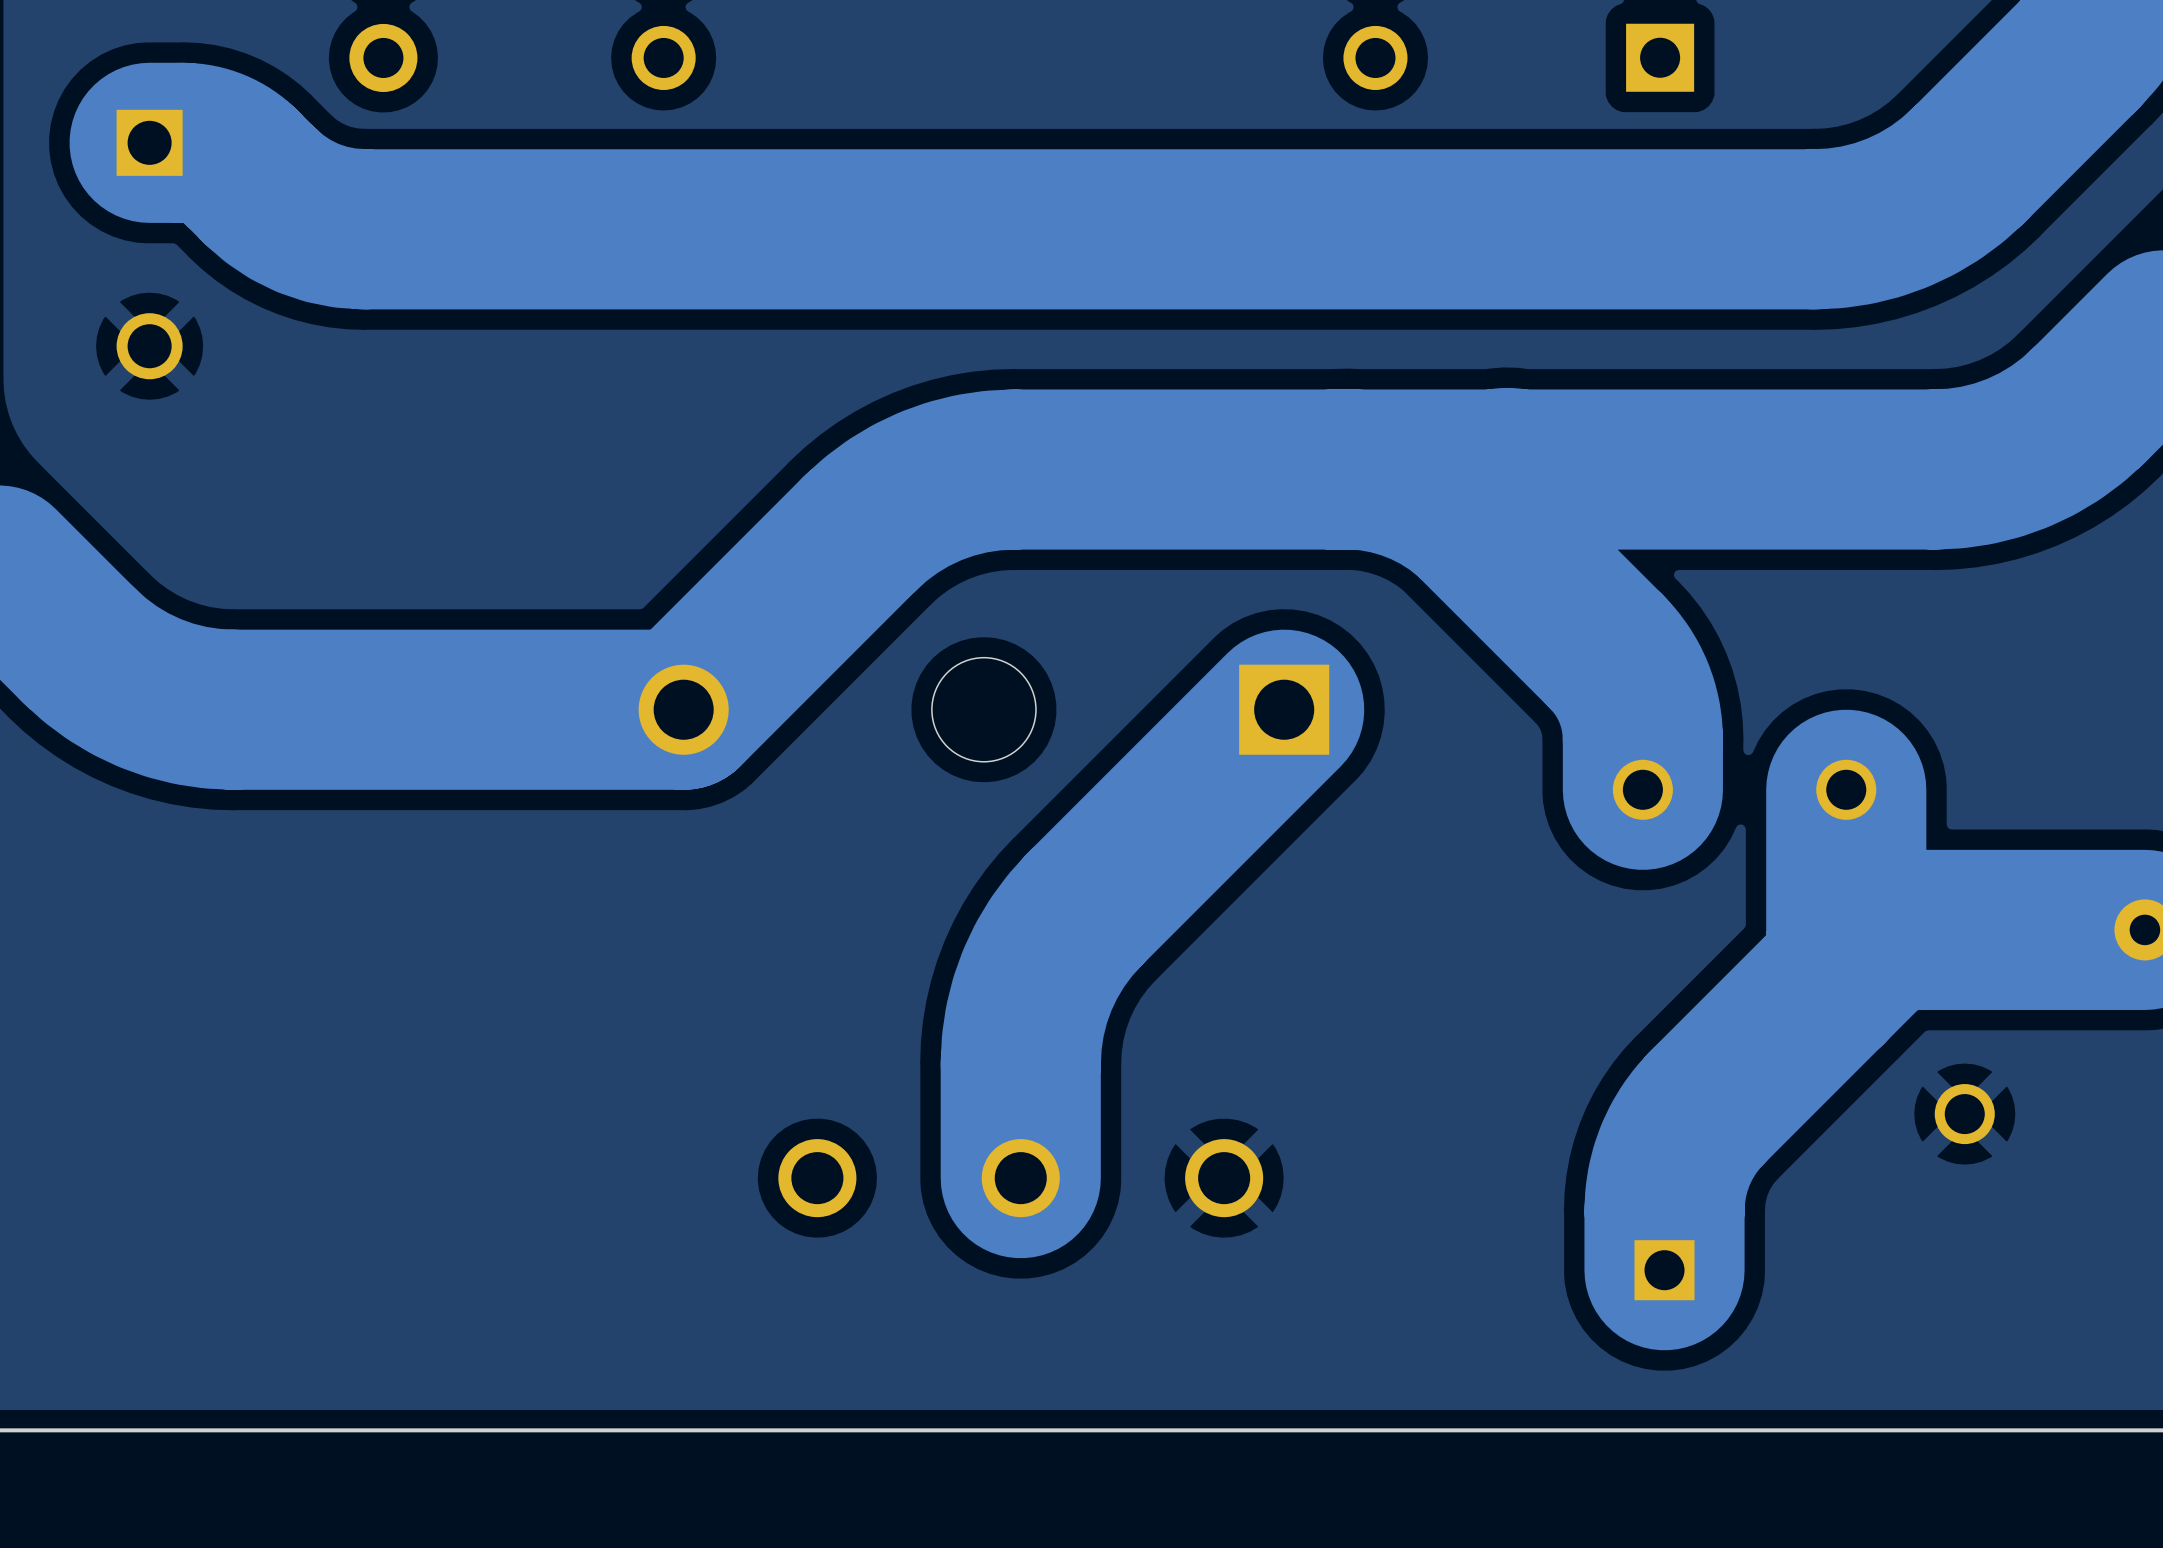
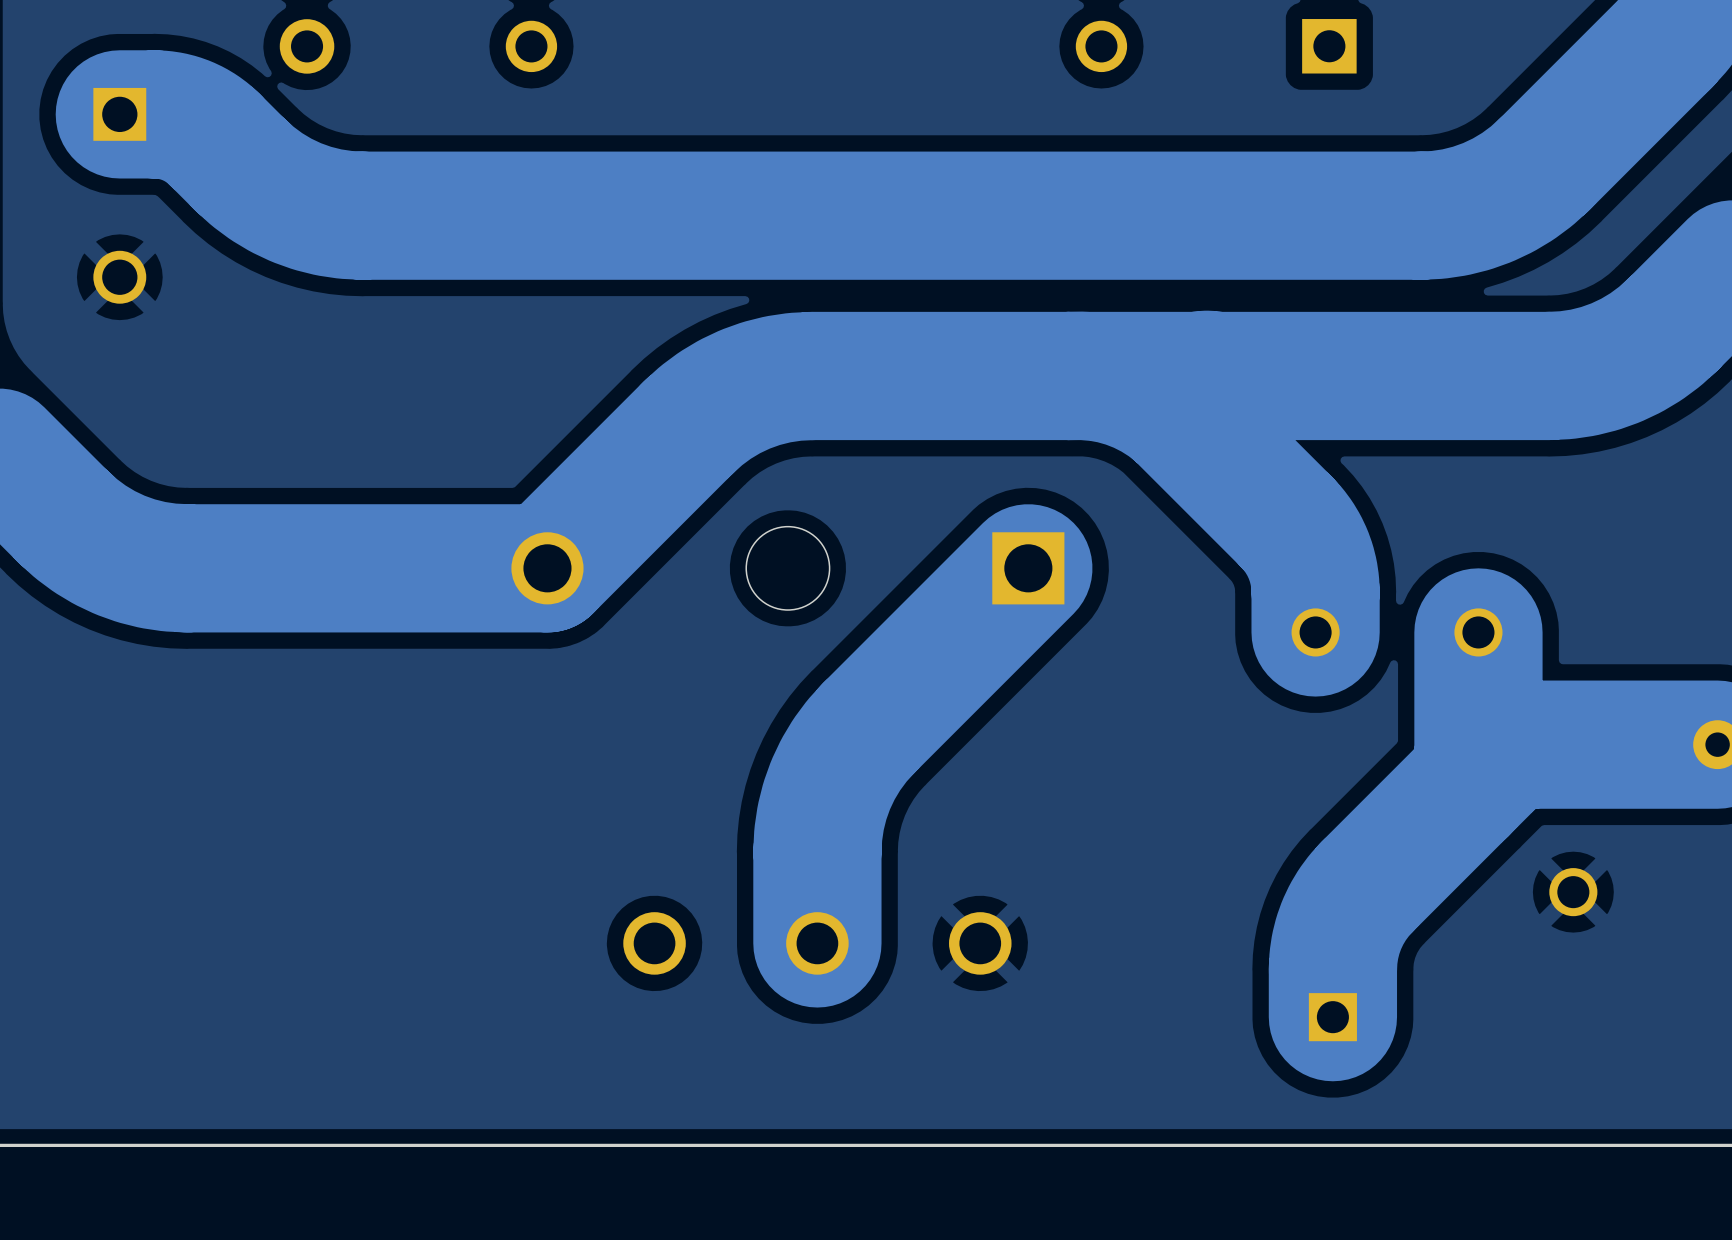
track: (183, 142) (206, 146) (228, 156) (274, 198) (308, 218) (345, 228) (364, 229) (1814, 229) (1856, 225) (1897, 212) (1935, 192) (1968, 165) -> (146, 114) (171, 116) (194, 124) (208, 133) (252, 176) (281, 195) (296, 202) (328, 212) (362, 215) (1438, 214) (1471, 208) (1503, 195) (1531, 176) (1576, 132)

